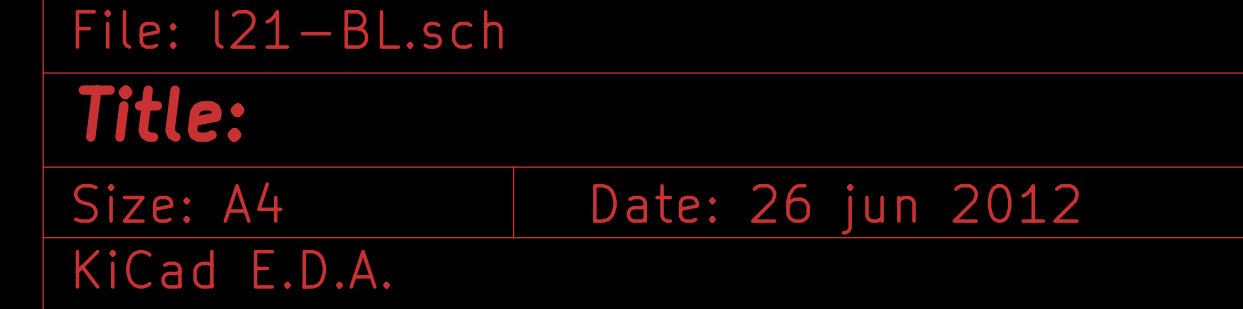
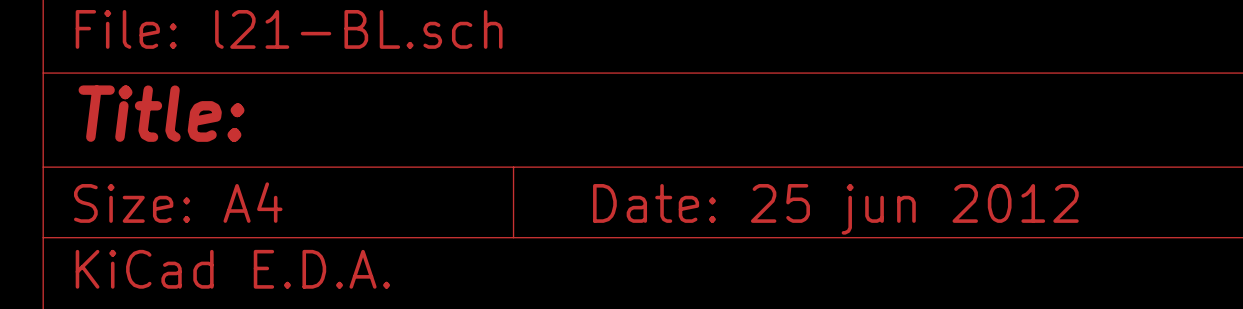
title block: Date: 26 jun 2012 (835, 209) -> Date: 25 jun 2012 (835, 209)

